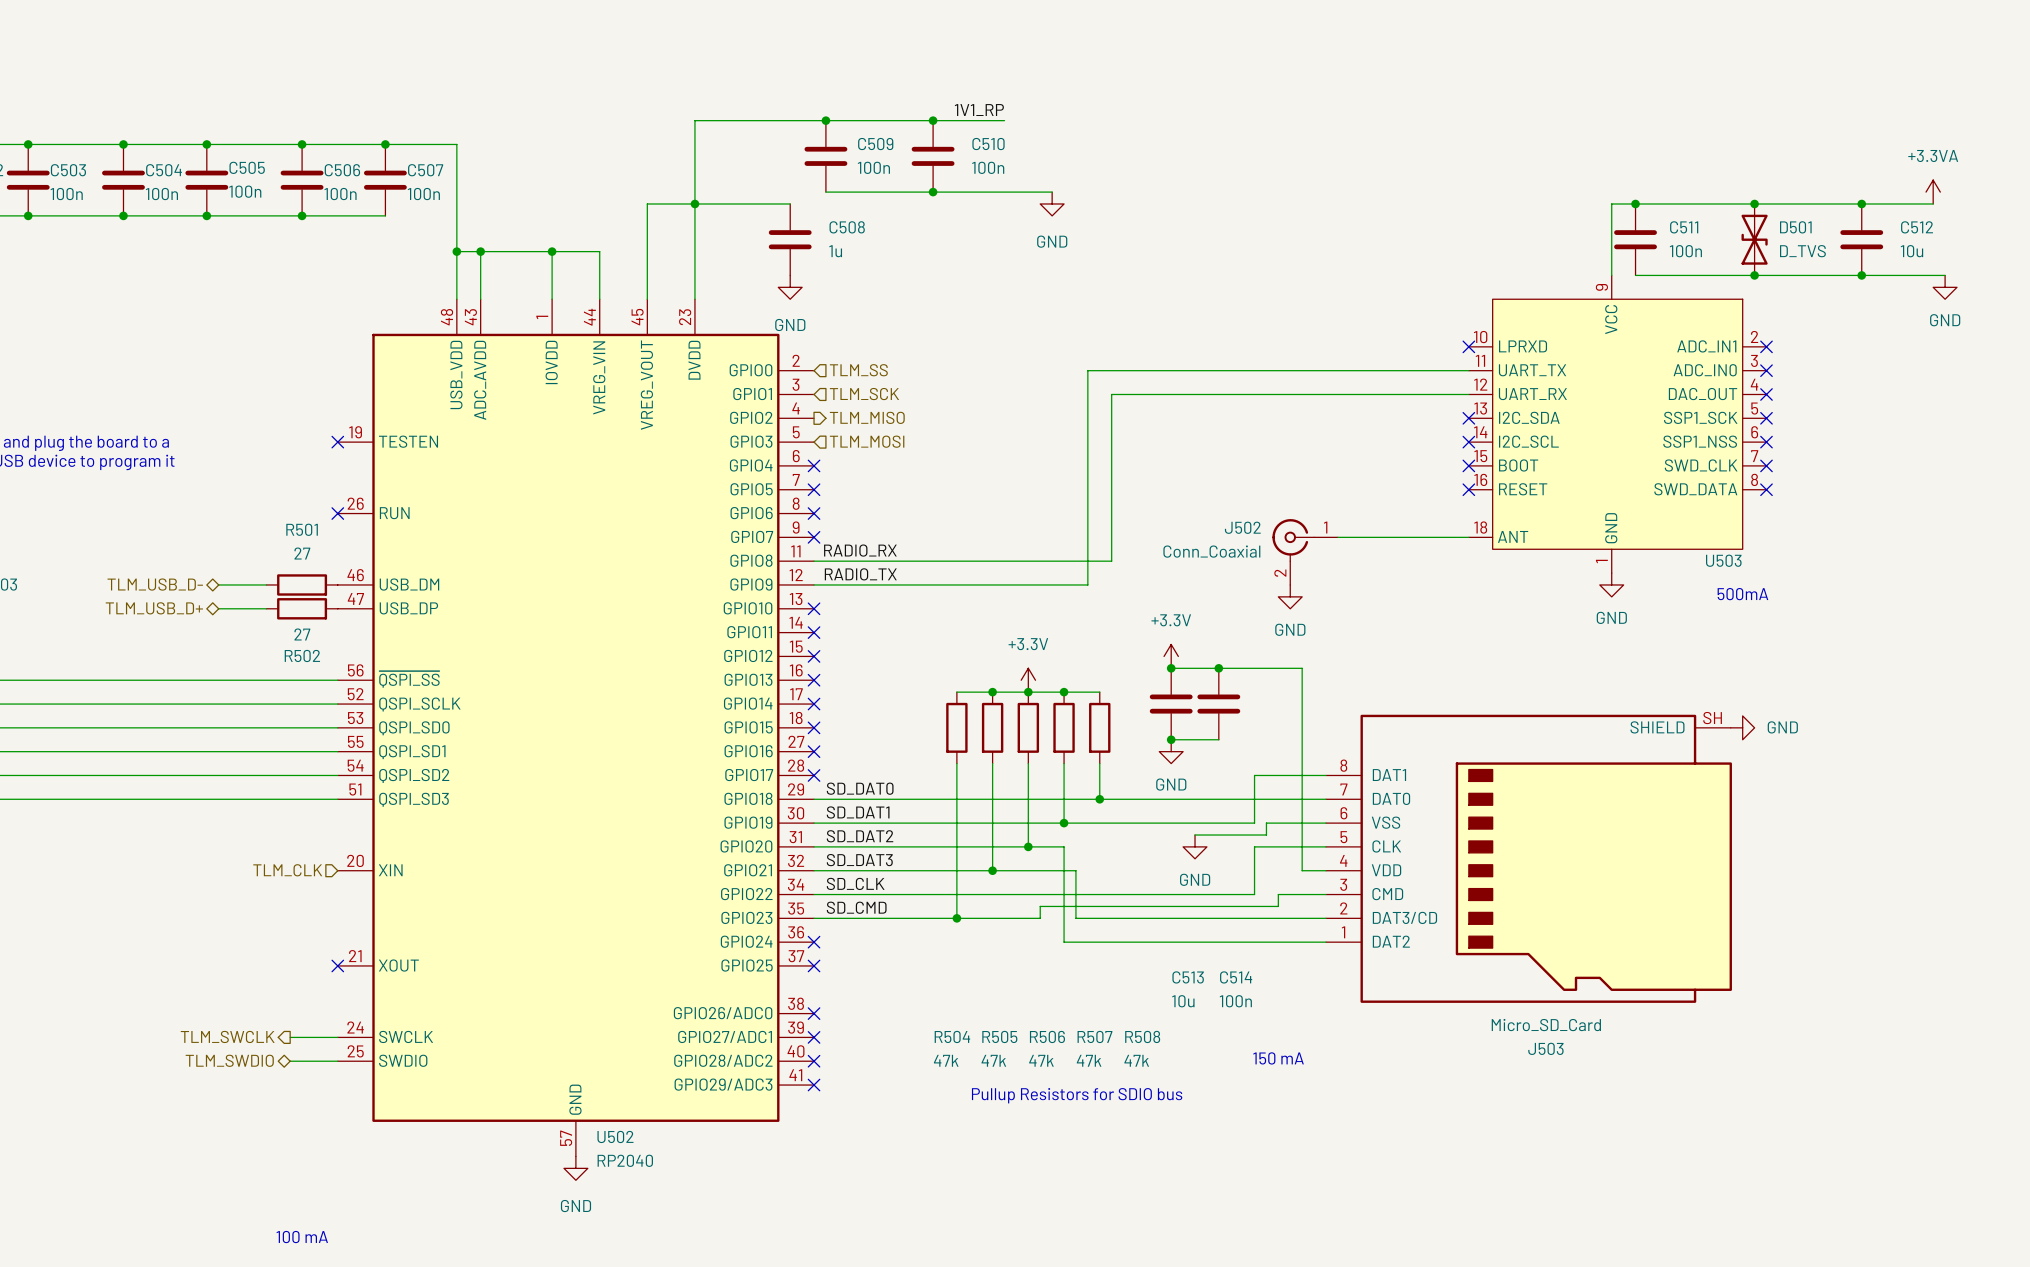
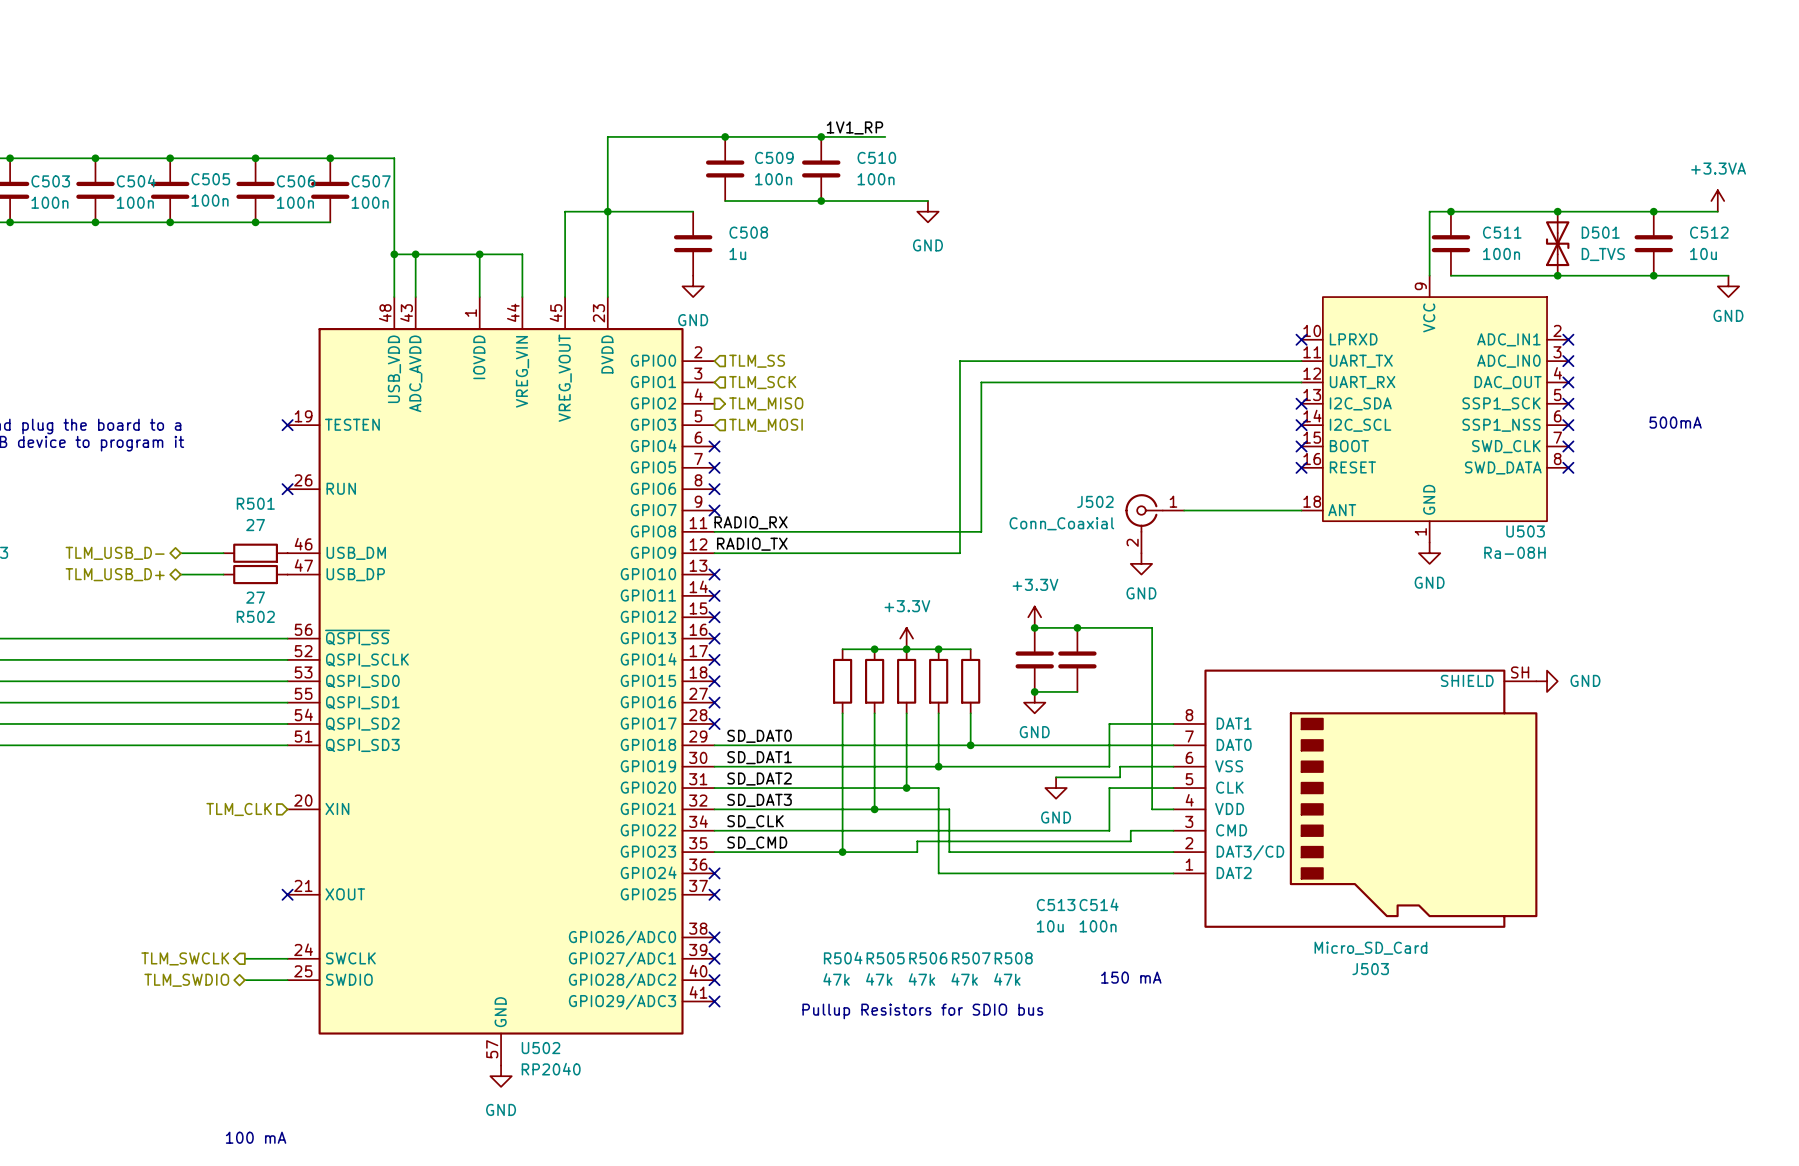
U503 value: none -> Ra-08H (1515, 552)
text position: 500mA (1742, 594) -> 500mA (1675, 422)

